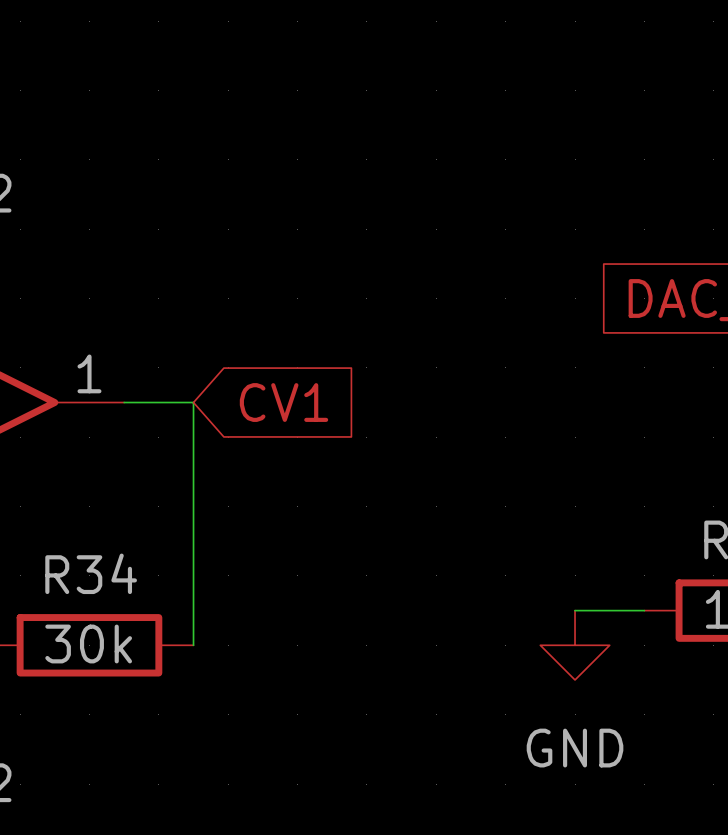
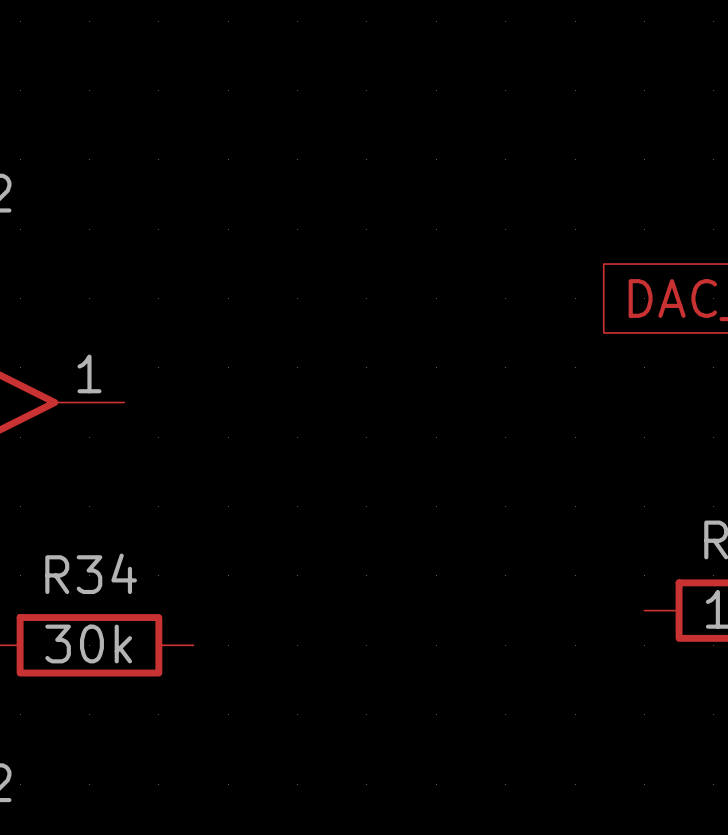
wire: (124, 402) (193, 402) (193, 645) -> none
global label: CV1 (284, 402) -> none
wire: (575, 610) (644, 610) -> none
power symbol: GND (575, 645) -> none

